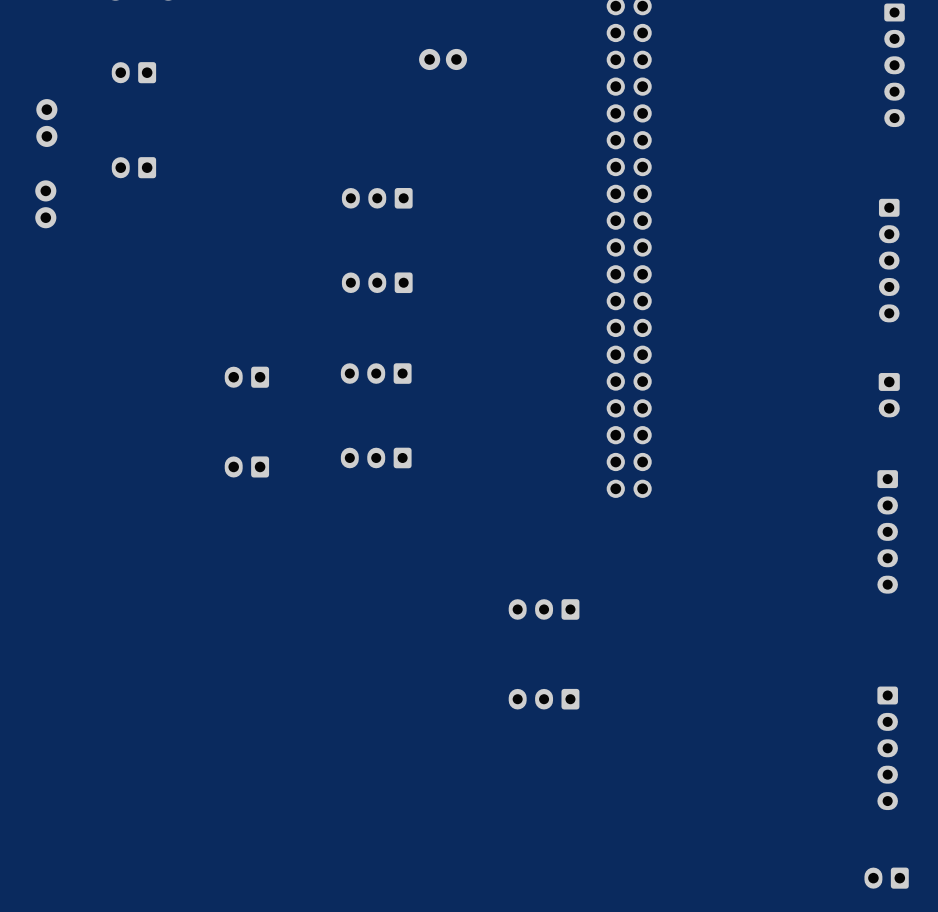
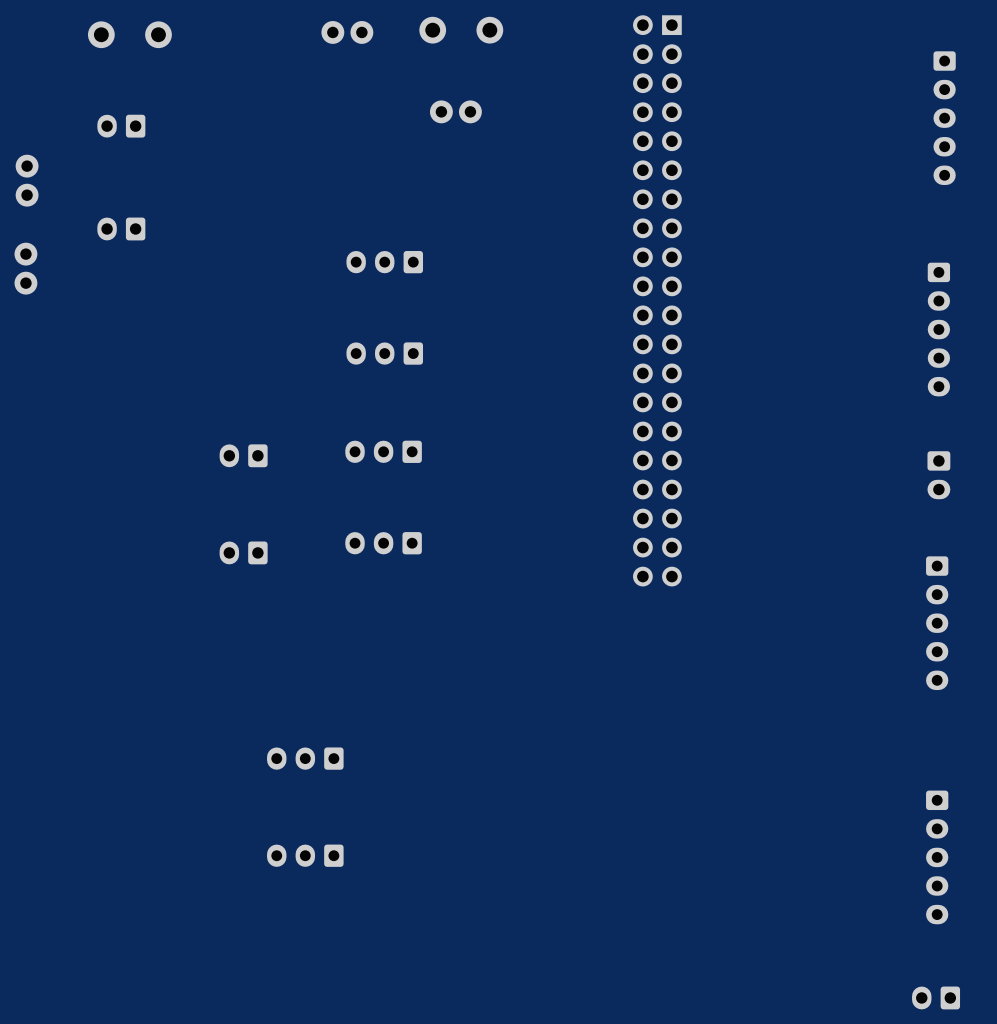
part: (544, 609) -> none
part: none -> (305, 758)
part: (544, 699) -> none
part: none -> (305, 855)

